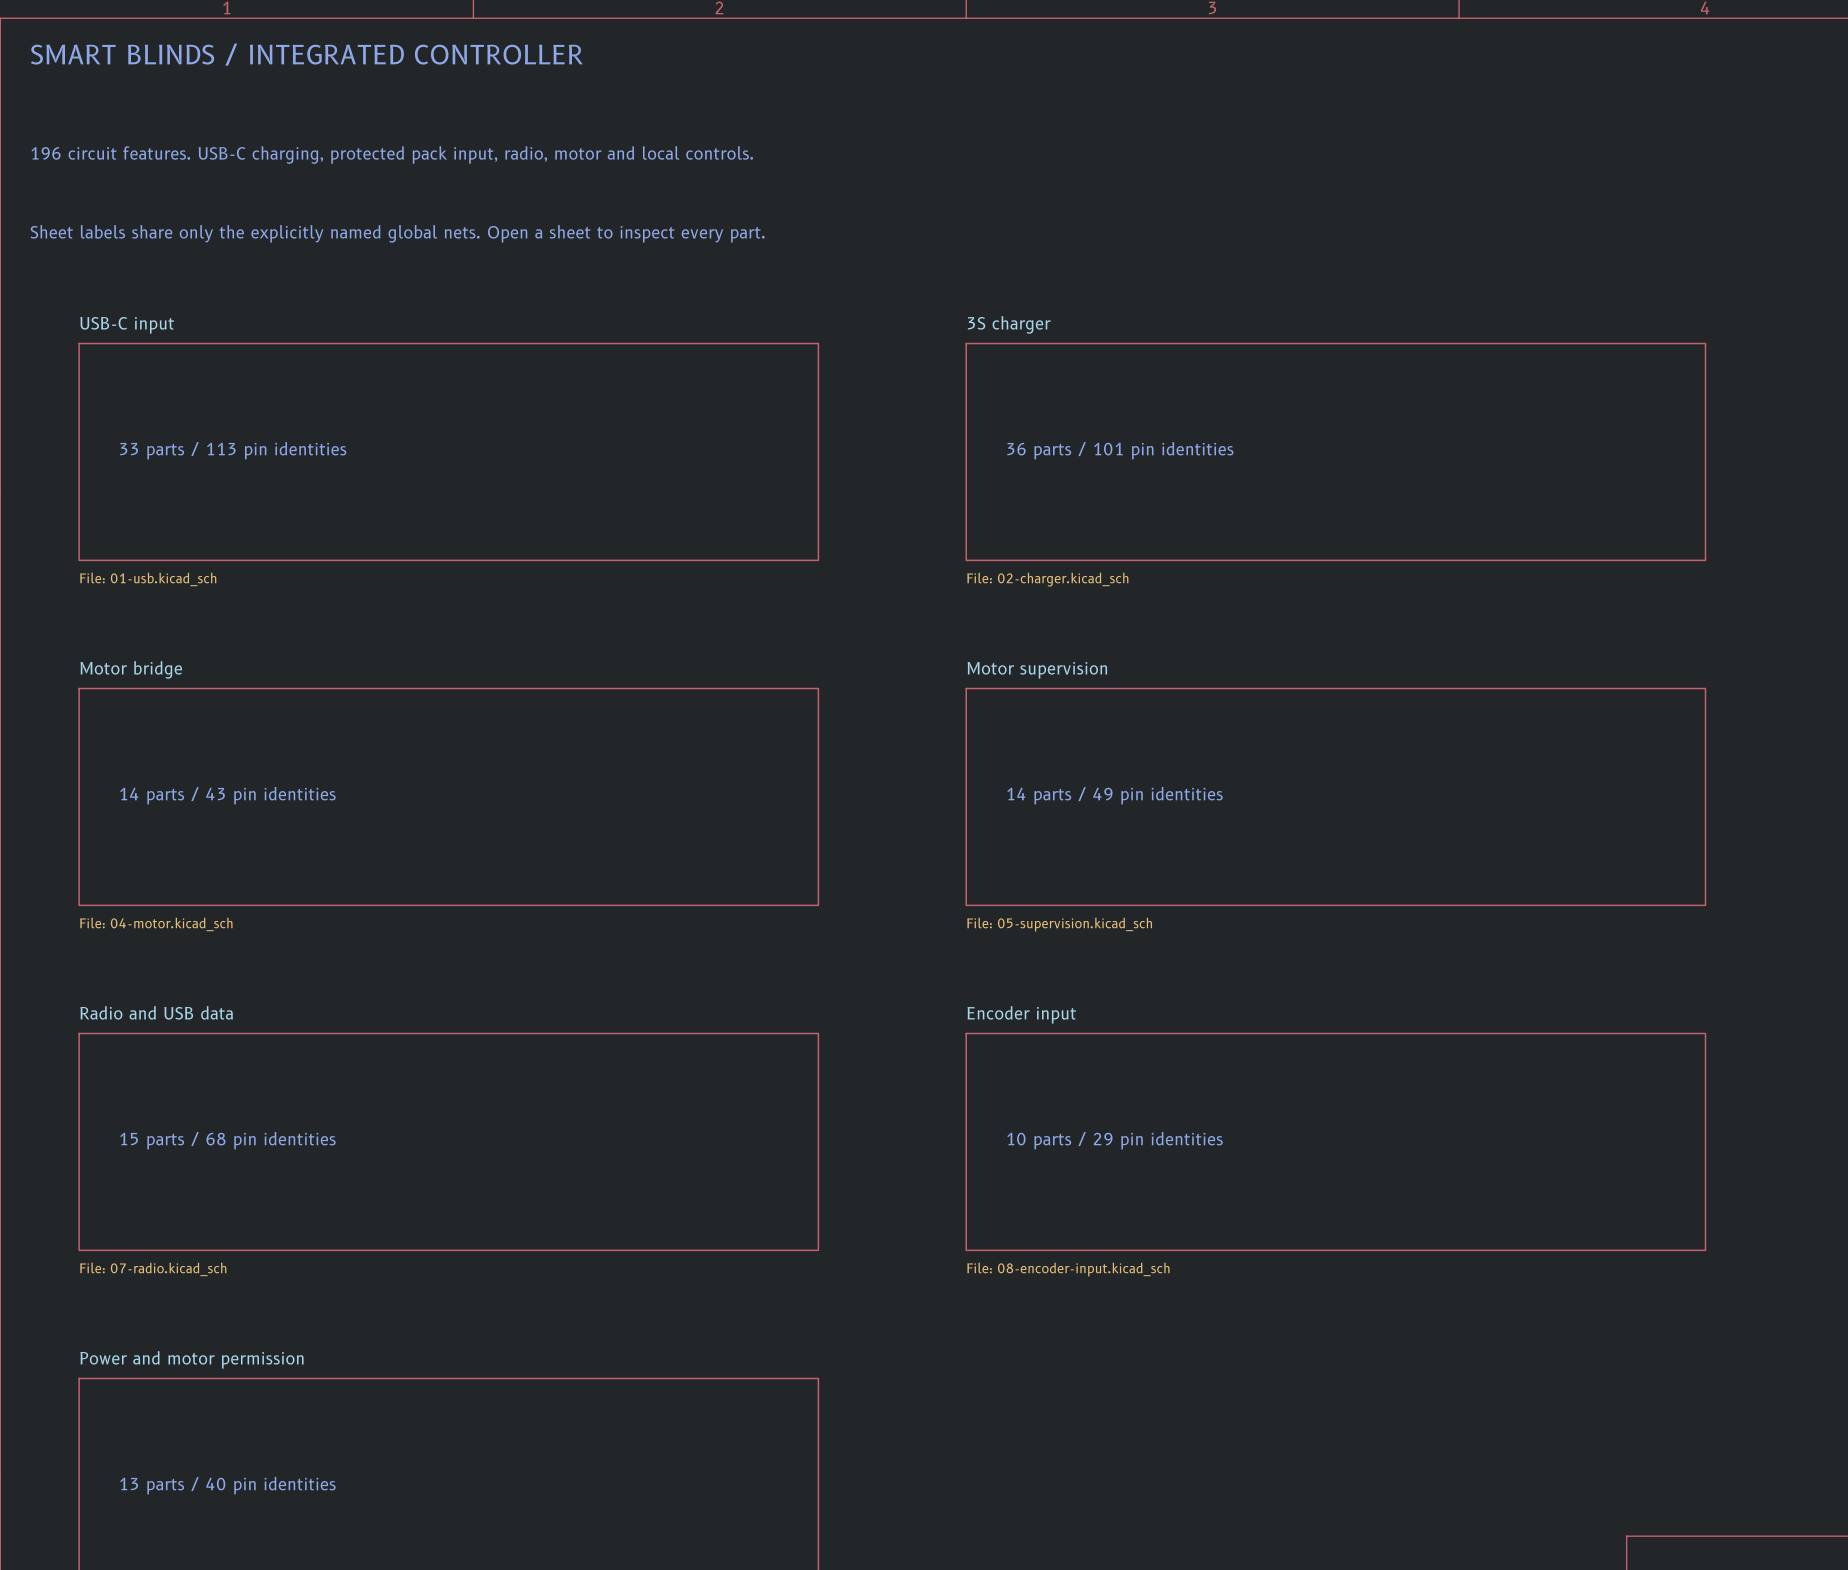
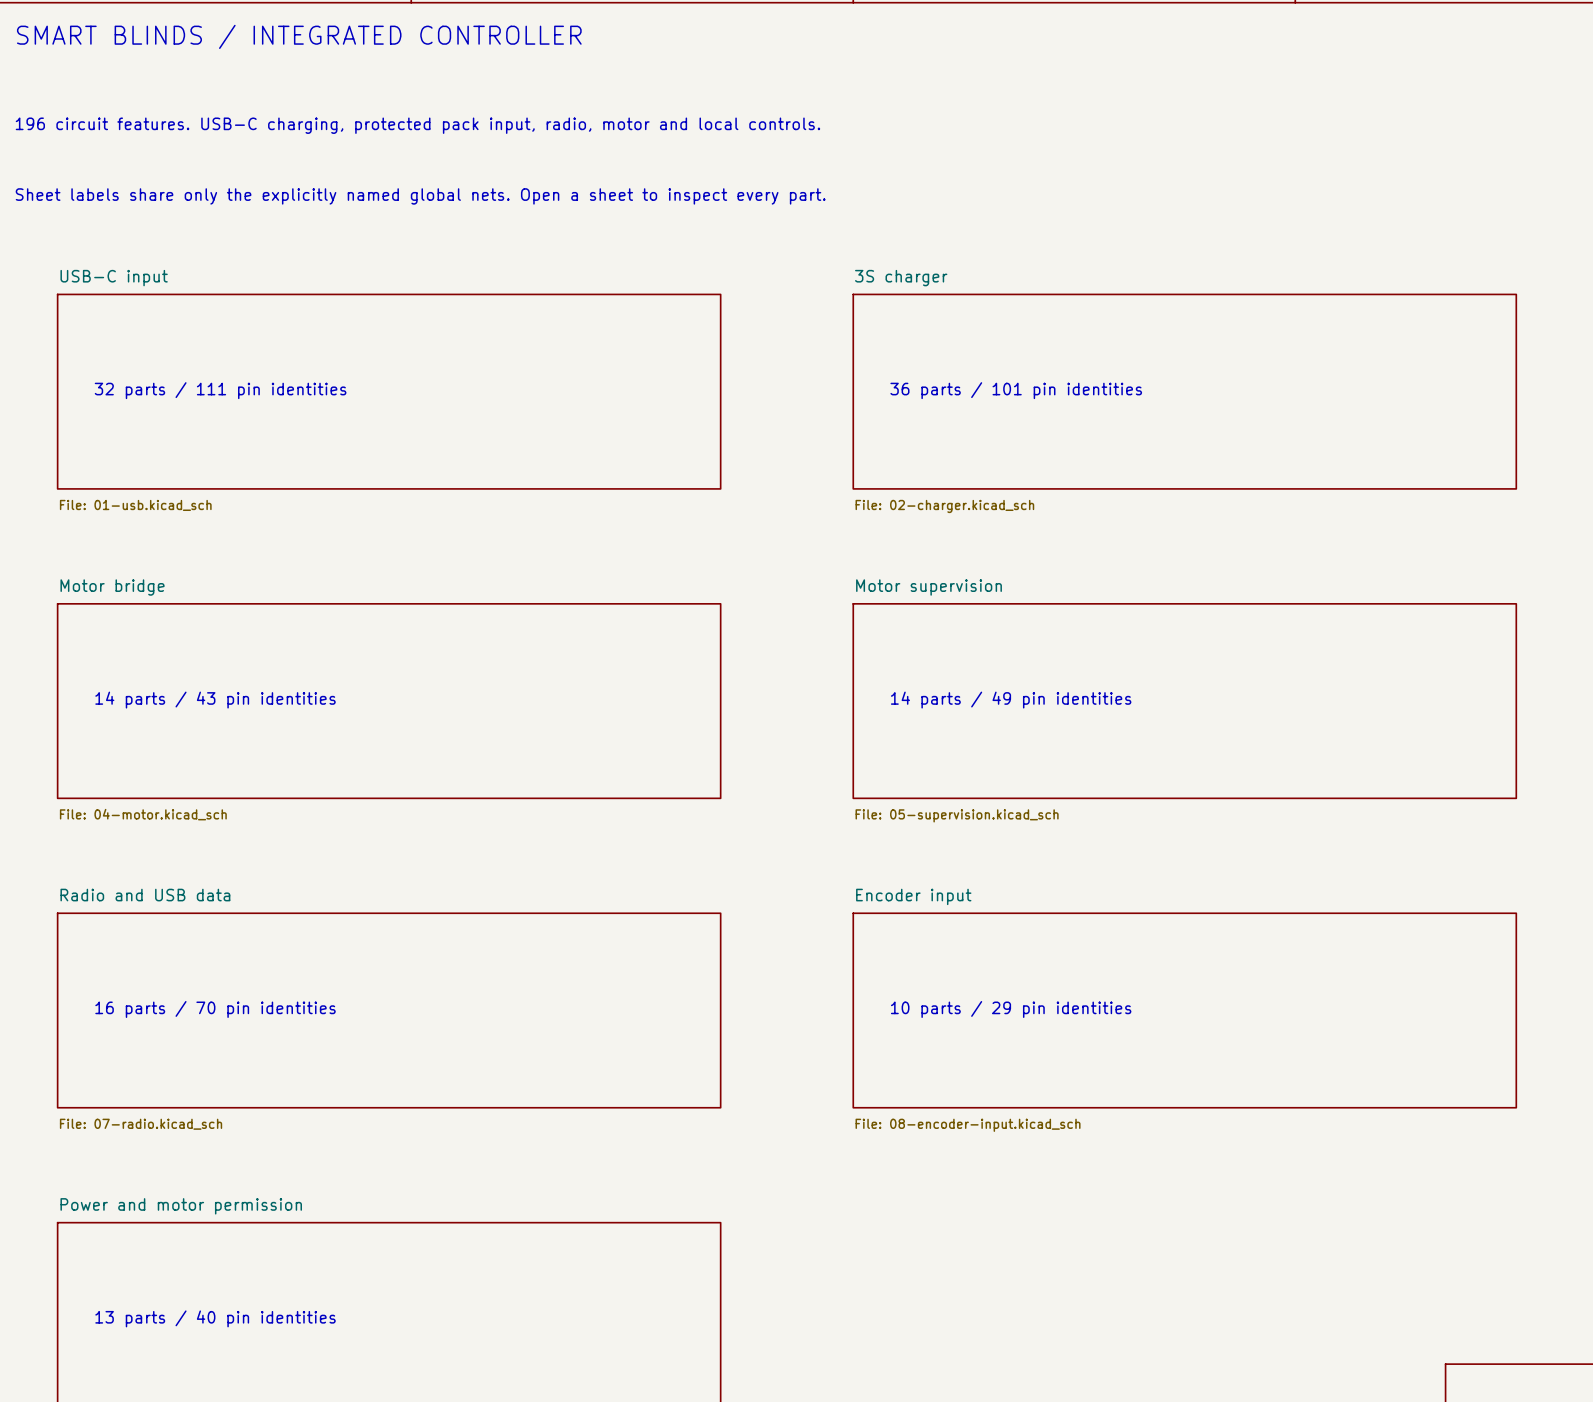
text: 33 parts / 113 pin identities (233, 450) -> 32 parts / 111 pin identities (220, 390)
text: 15 parts / 68 pin identities (227, 1140) -> 16 parts / 70 pin identities (215, 1009)

